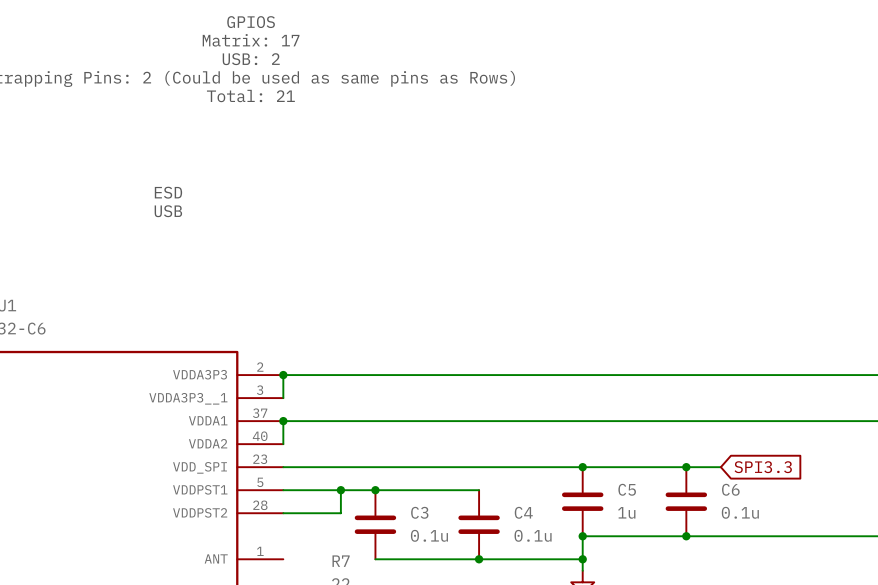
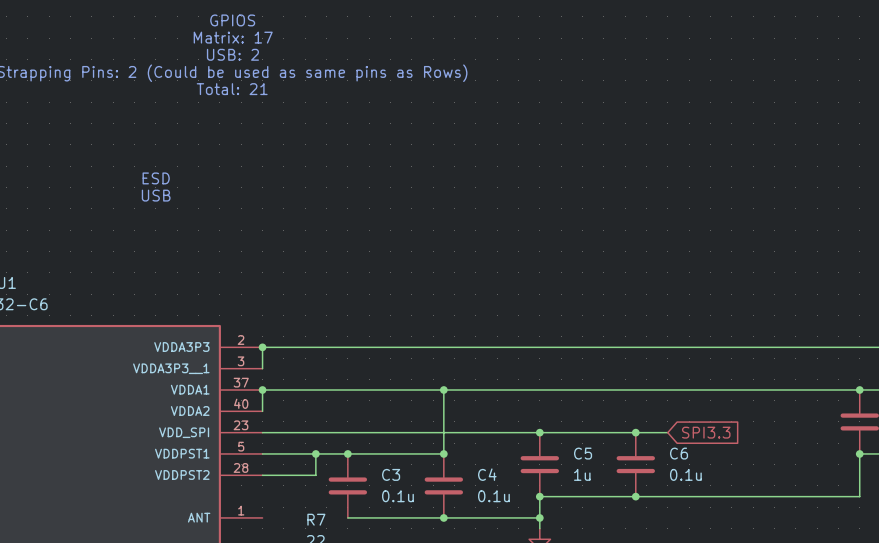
wire: none -> (443, 389) (443, 453)
junction: none -> (443, 389)
junction: none -> (443, 453)

